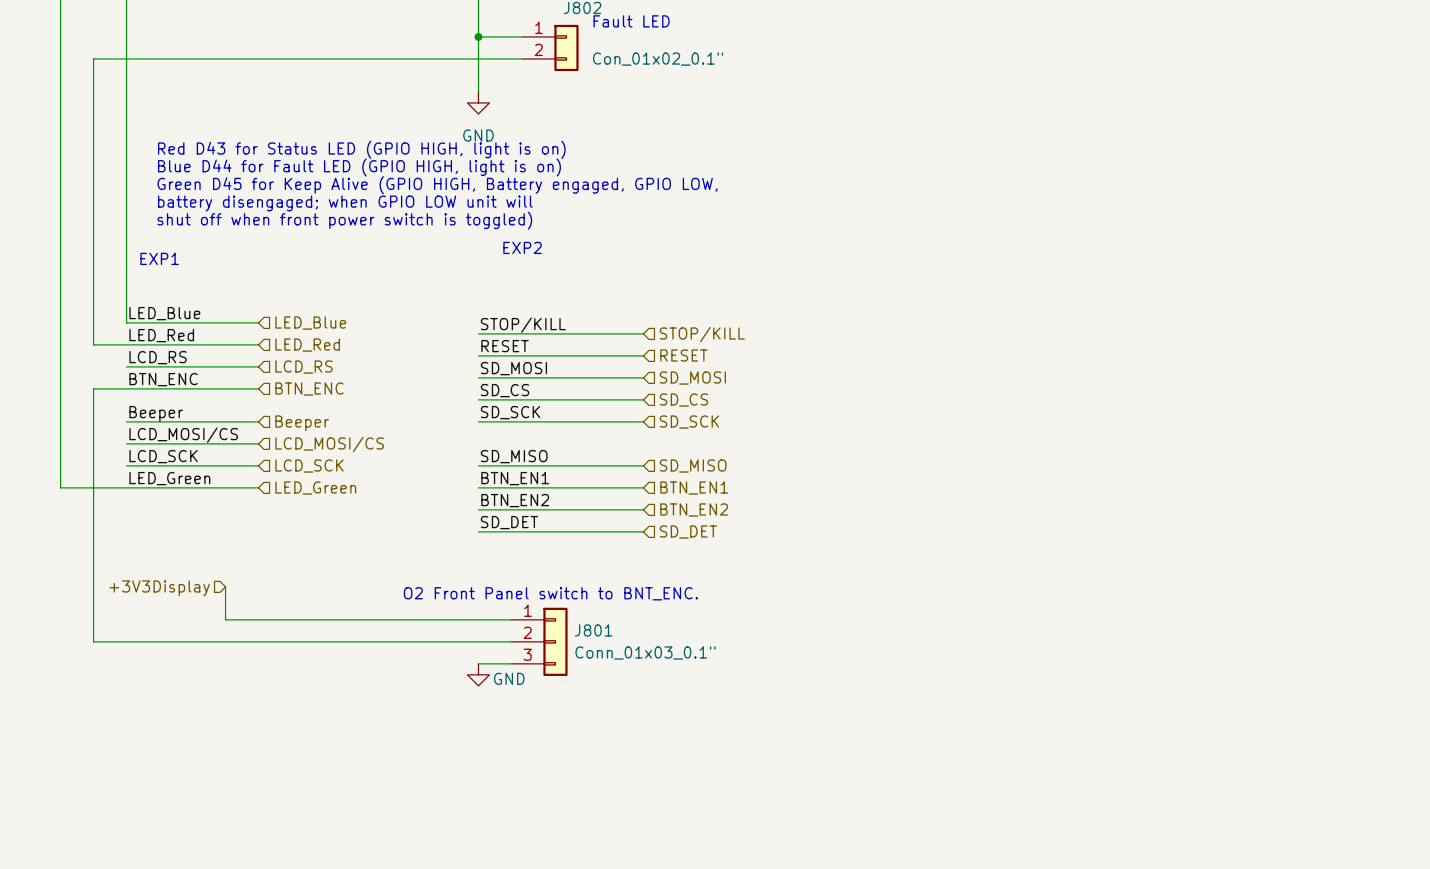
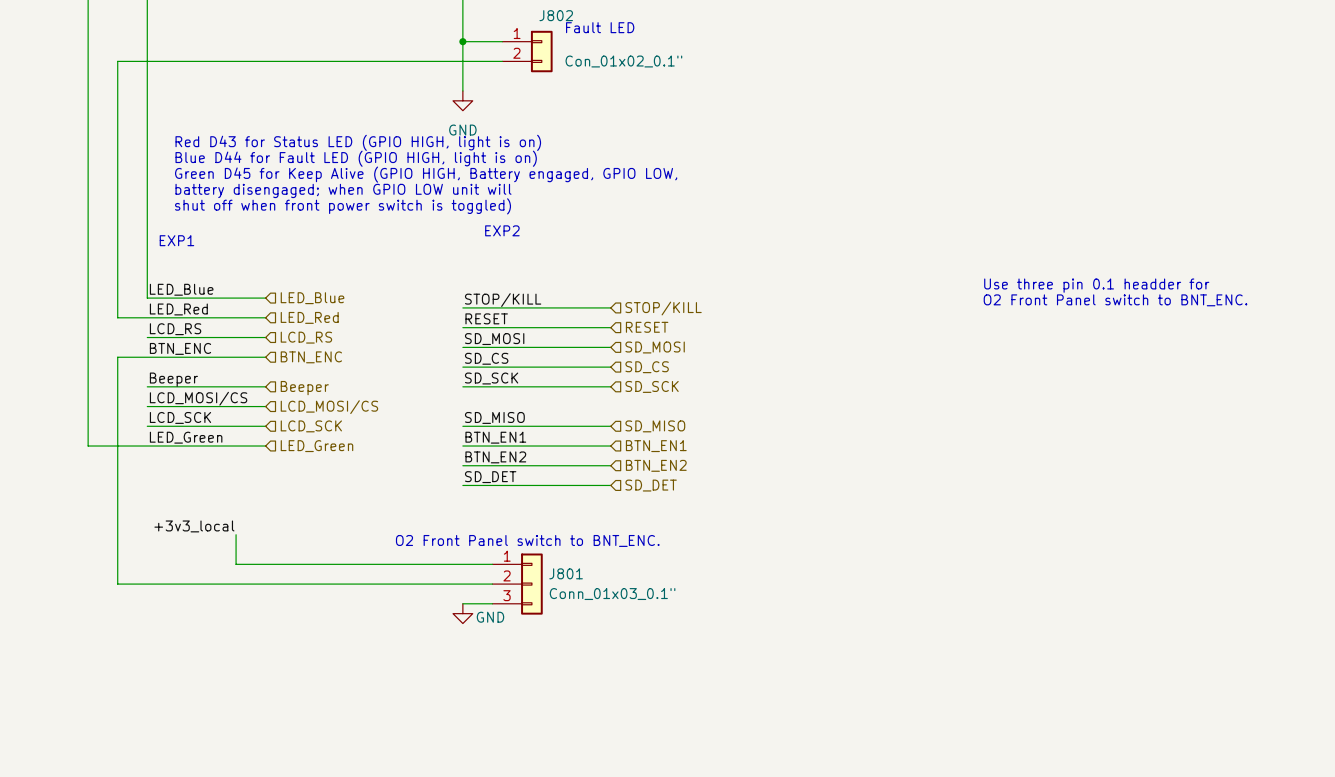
text: none -> Use three pin 0.1 headder for (1096, 285)
text: none -> O2 Front Panel switch to BNT_ENC. (1115, 300)
label: none -> +3v3_local (194, 526)
hierarchical label: +3V3Display (159, 588) -> none

